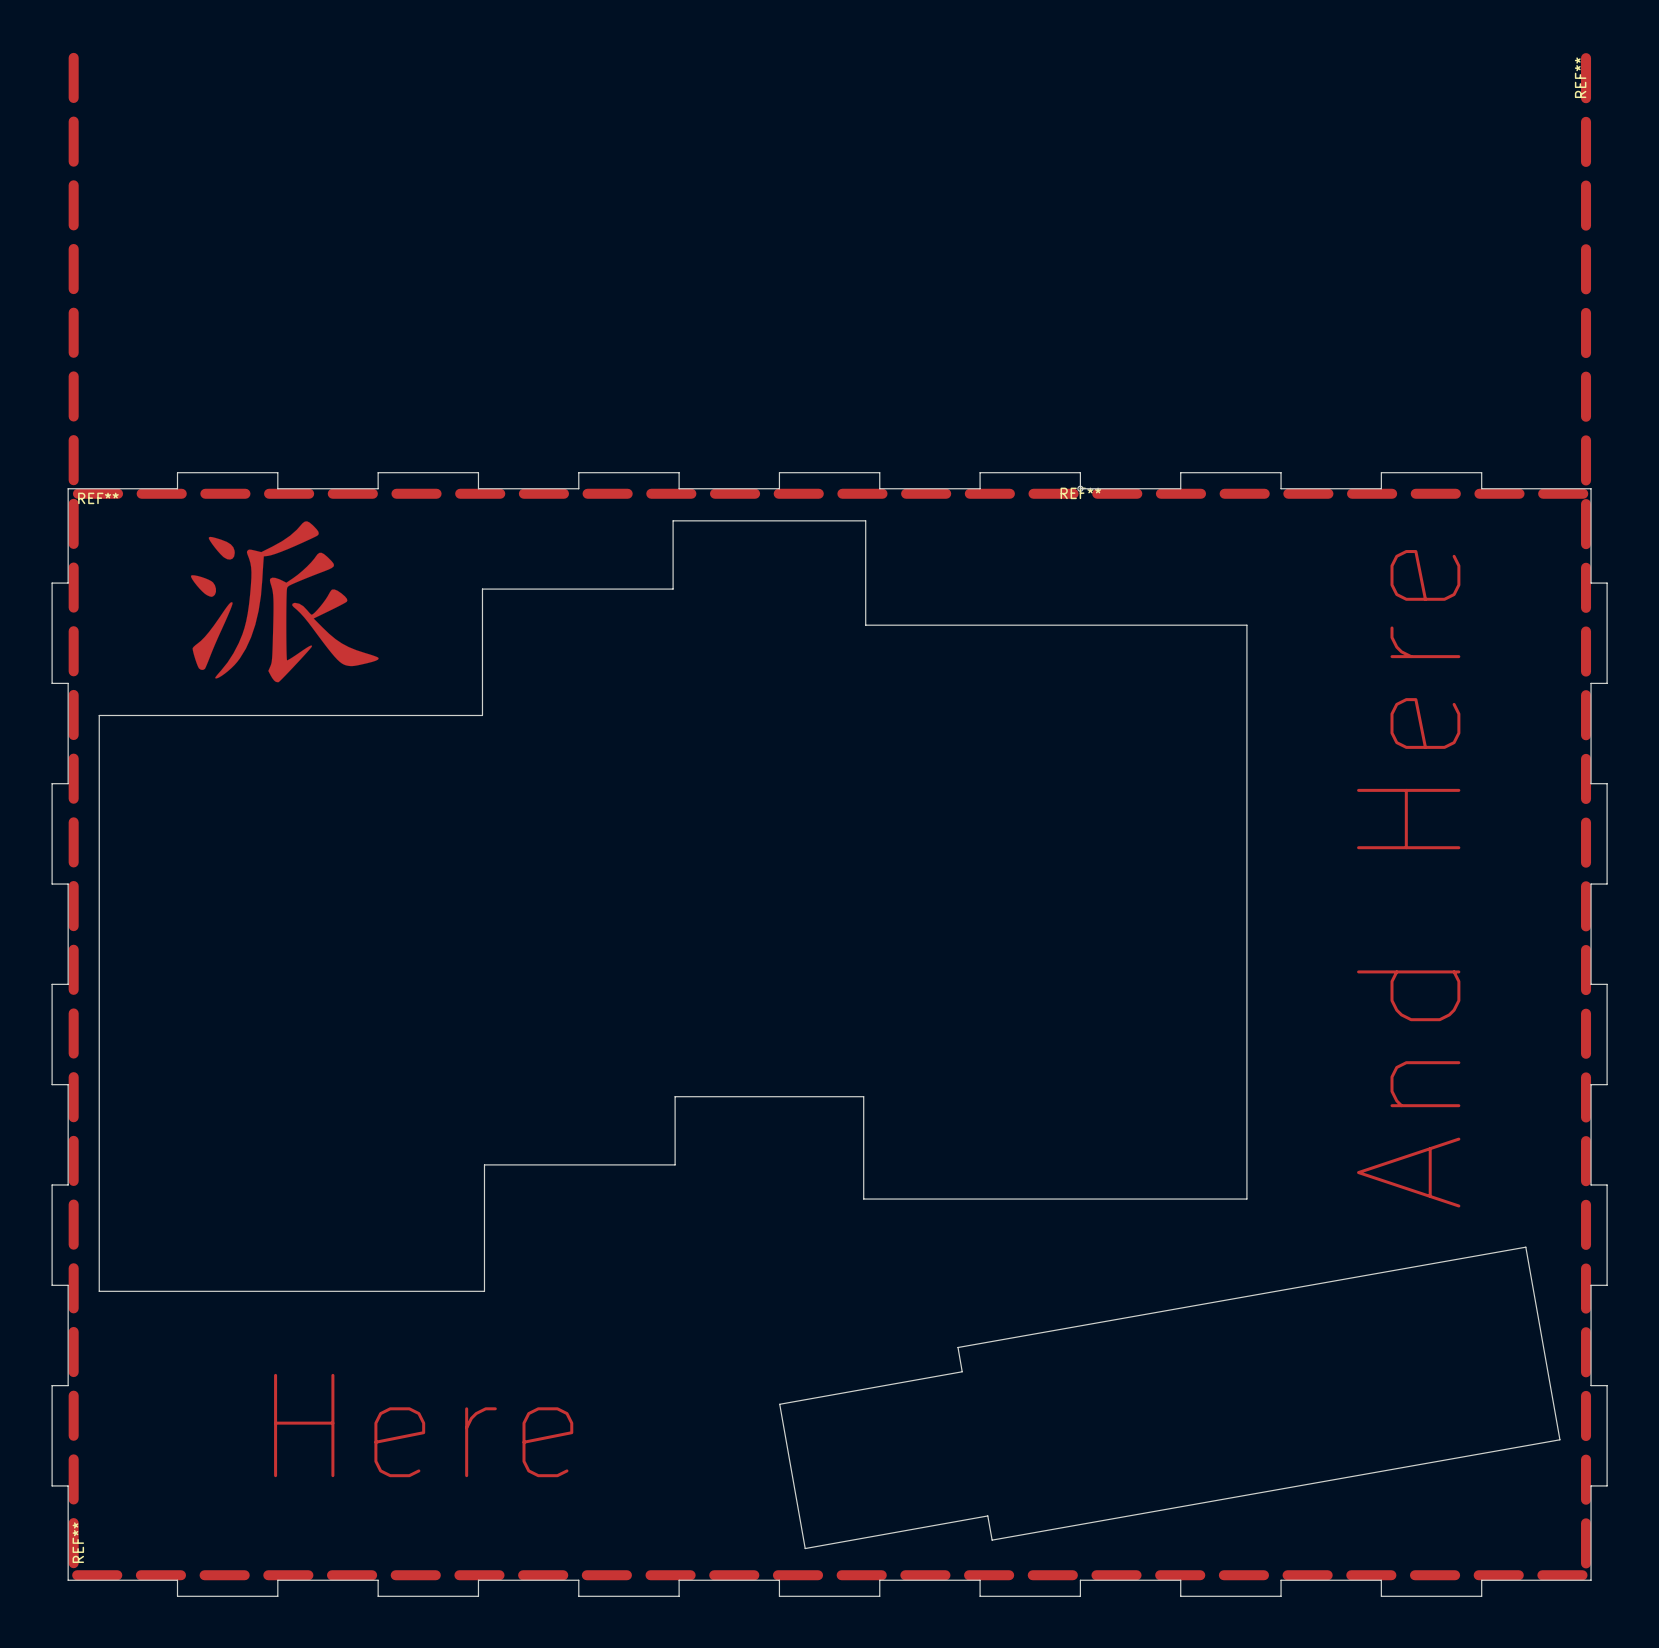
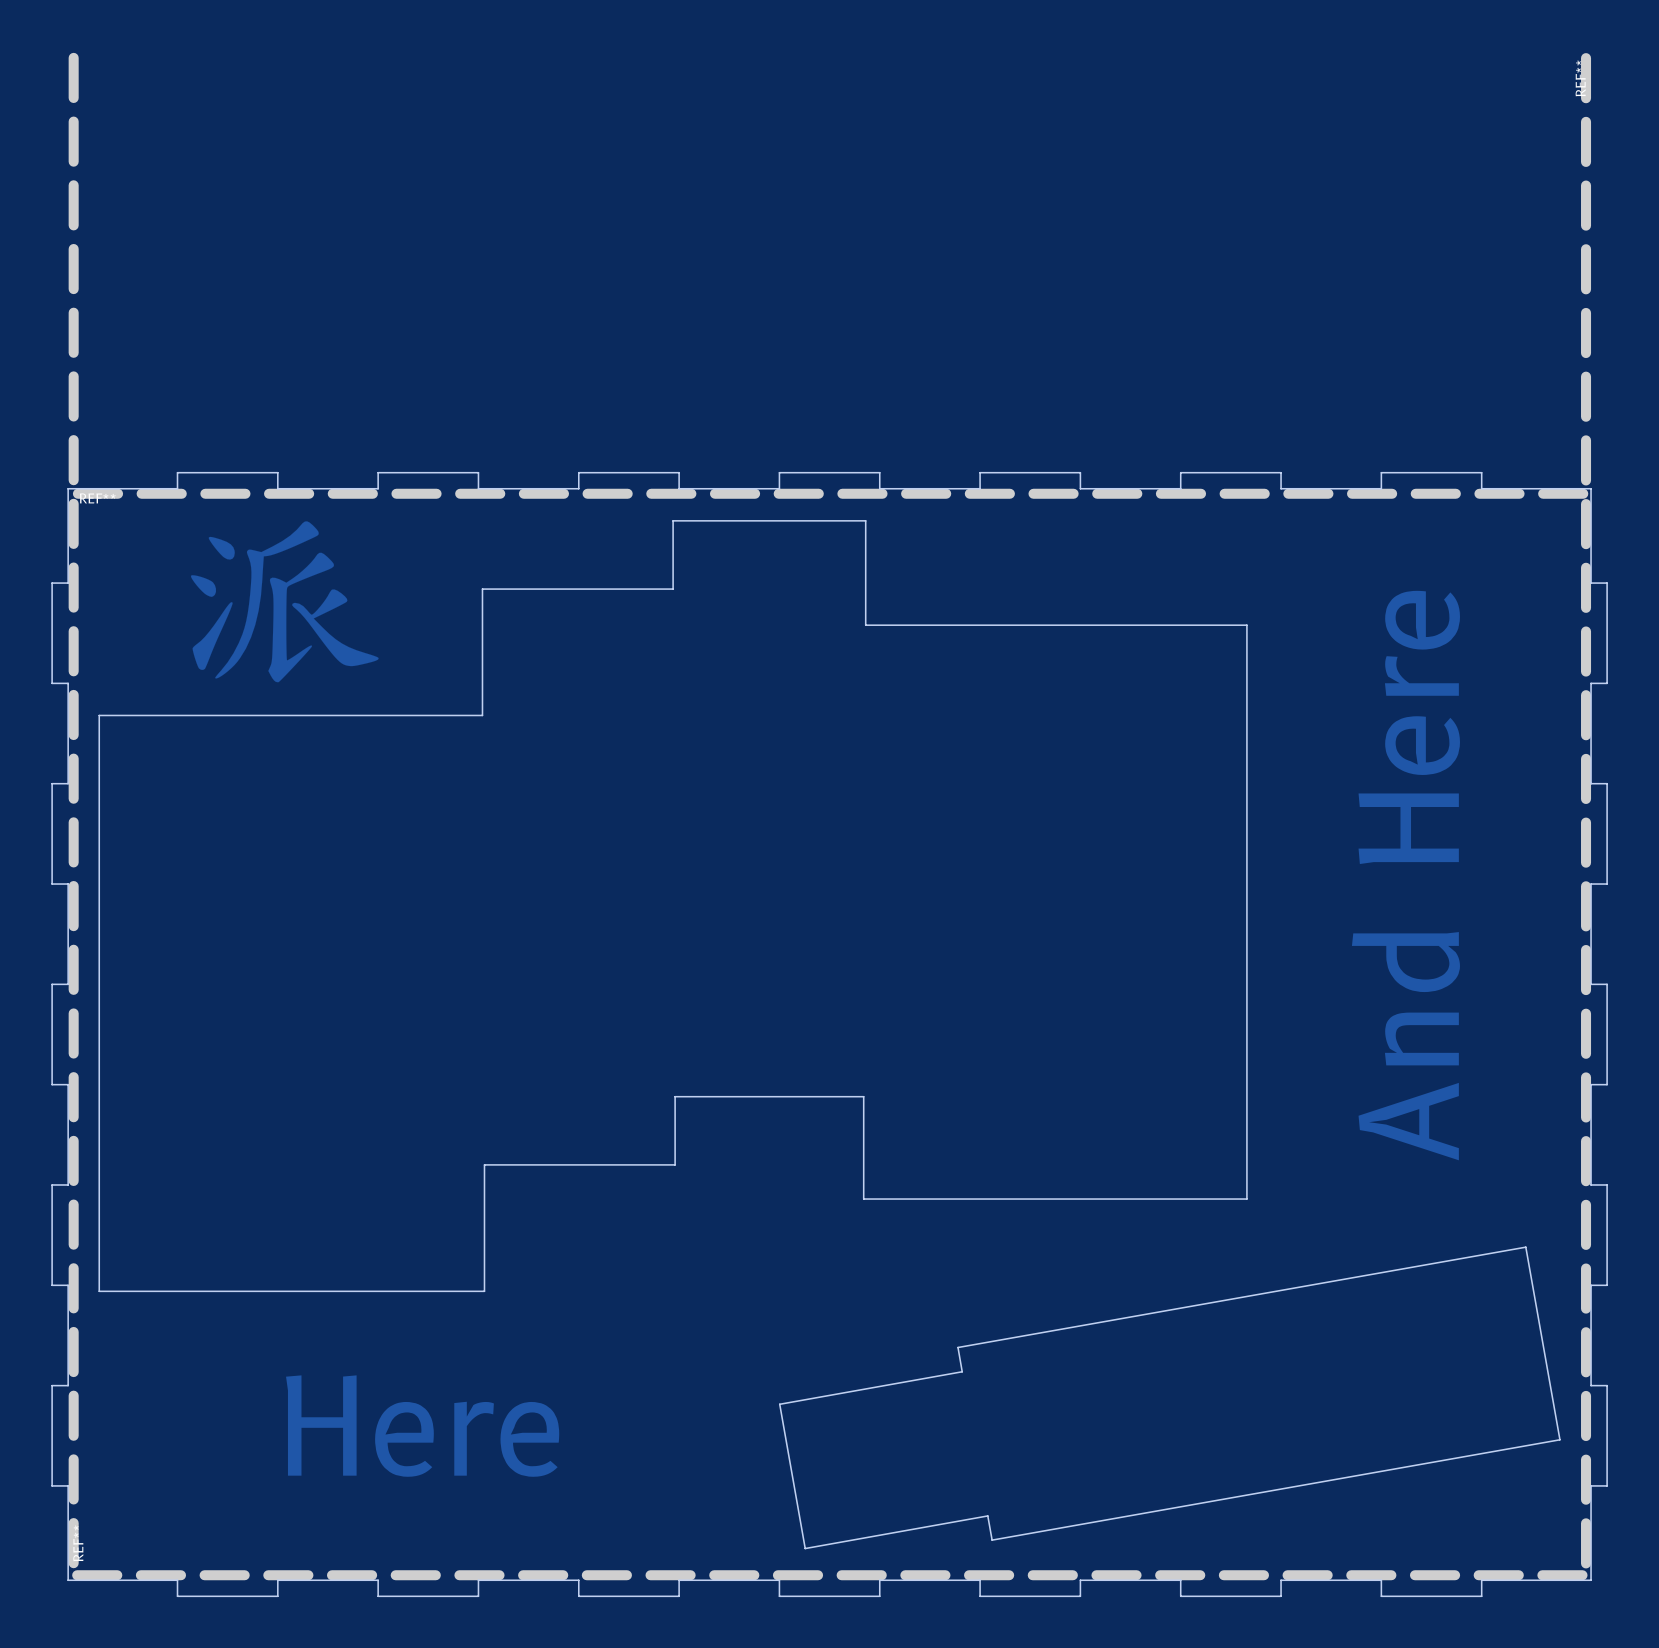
REF**: (1080, 488) -> none

